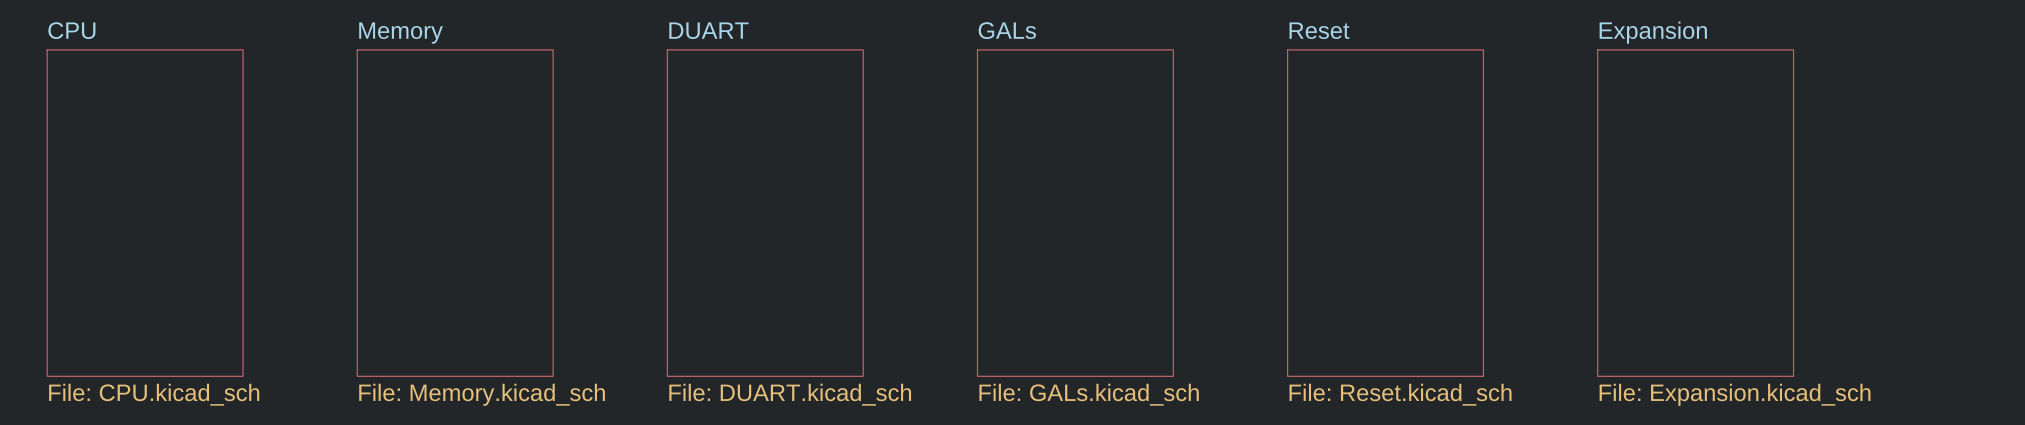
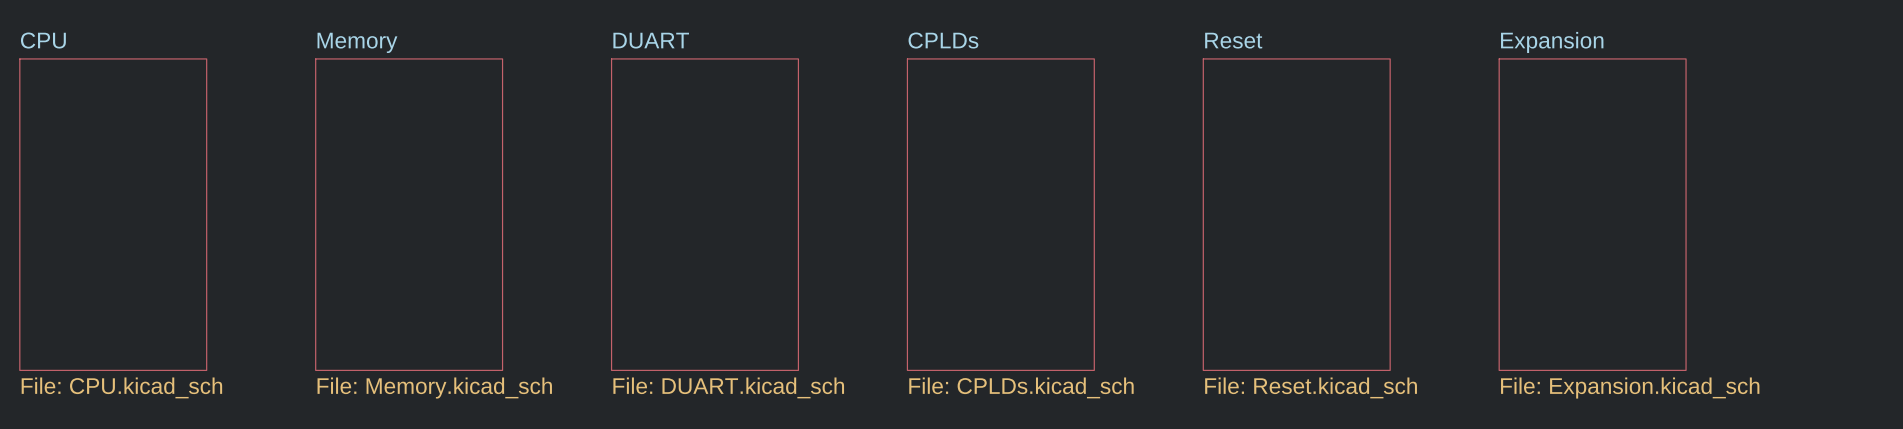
sheet GALs name: GALs (1007, 30) -> CPLDs (943, 40)
sheet GALs value: File: GALs.kicad_sch (1089, 394) -> File: CPLDs.kicad_sch (1021, 387)

